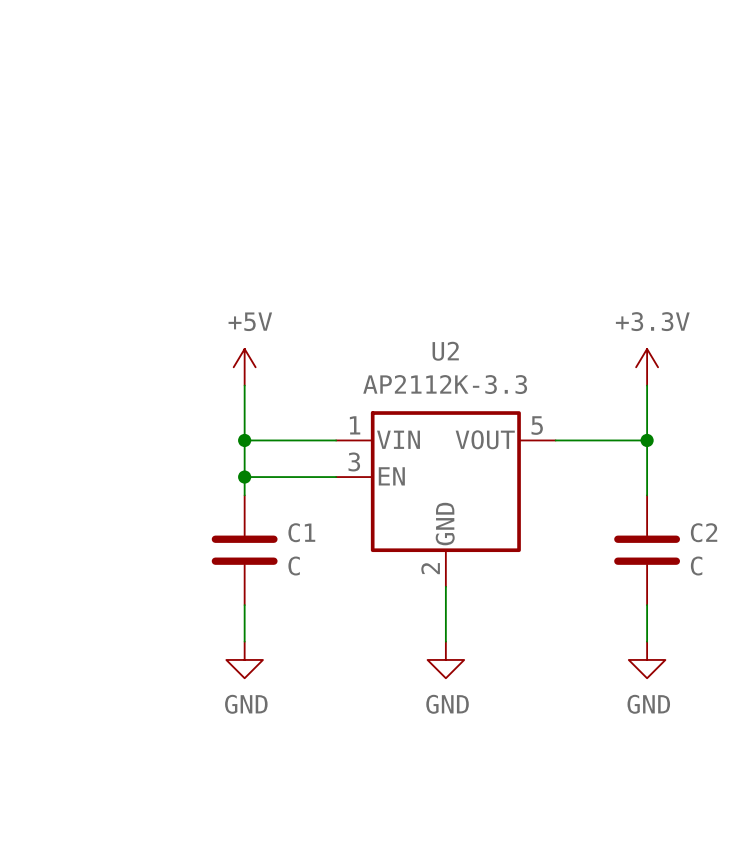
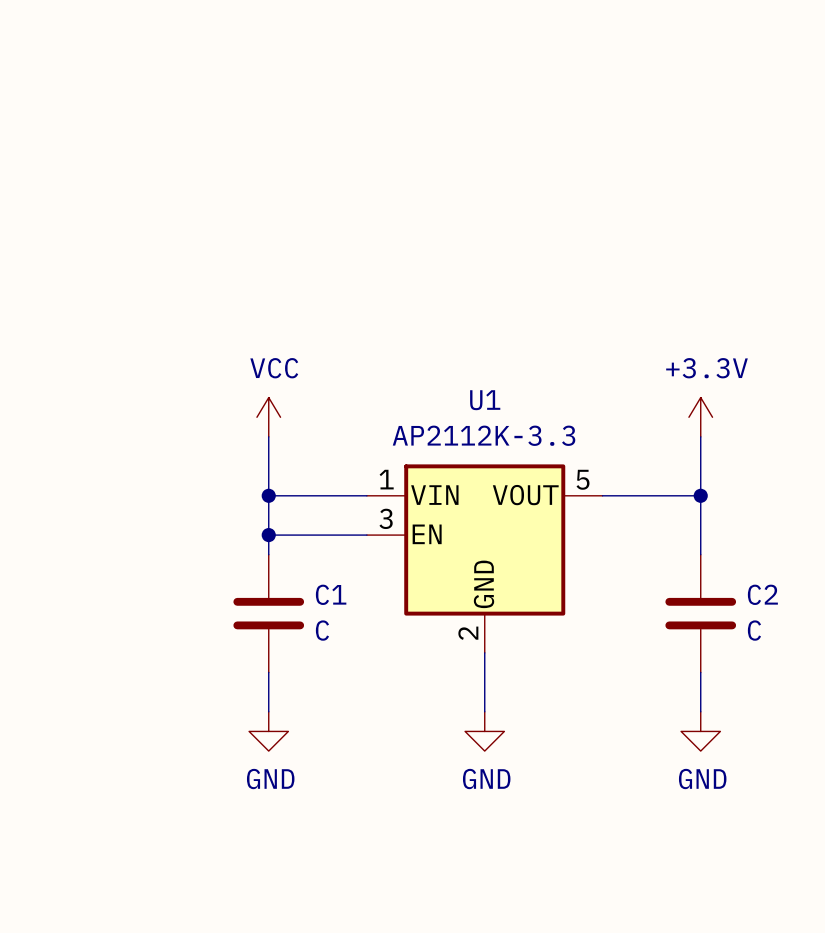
U2 name: U2 (445, 351) -> U1 (485, 400)
power symbol: +5V (244, 367) -> VCC (268, 417)

